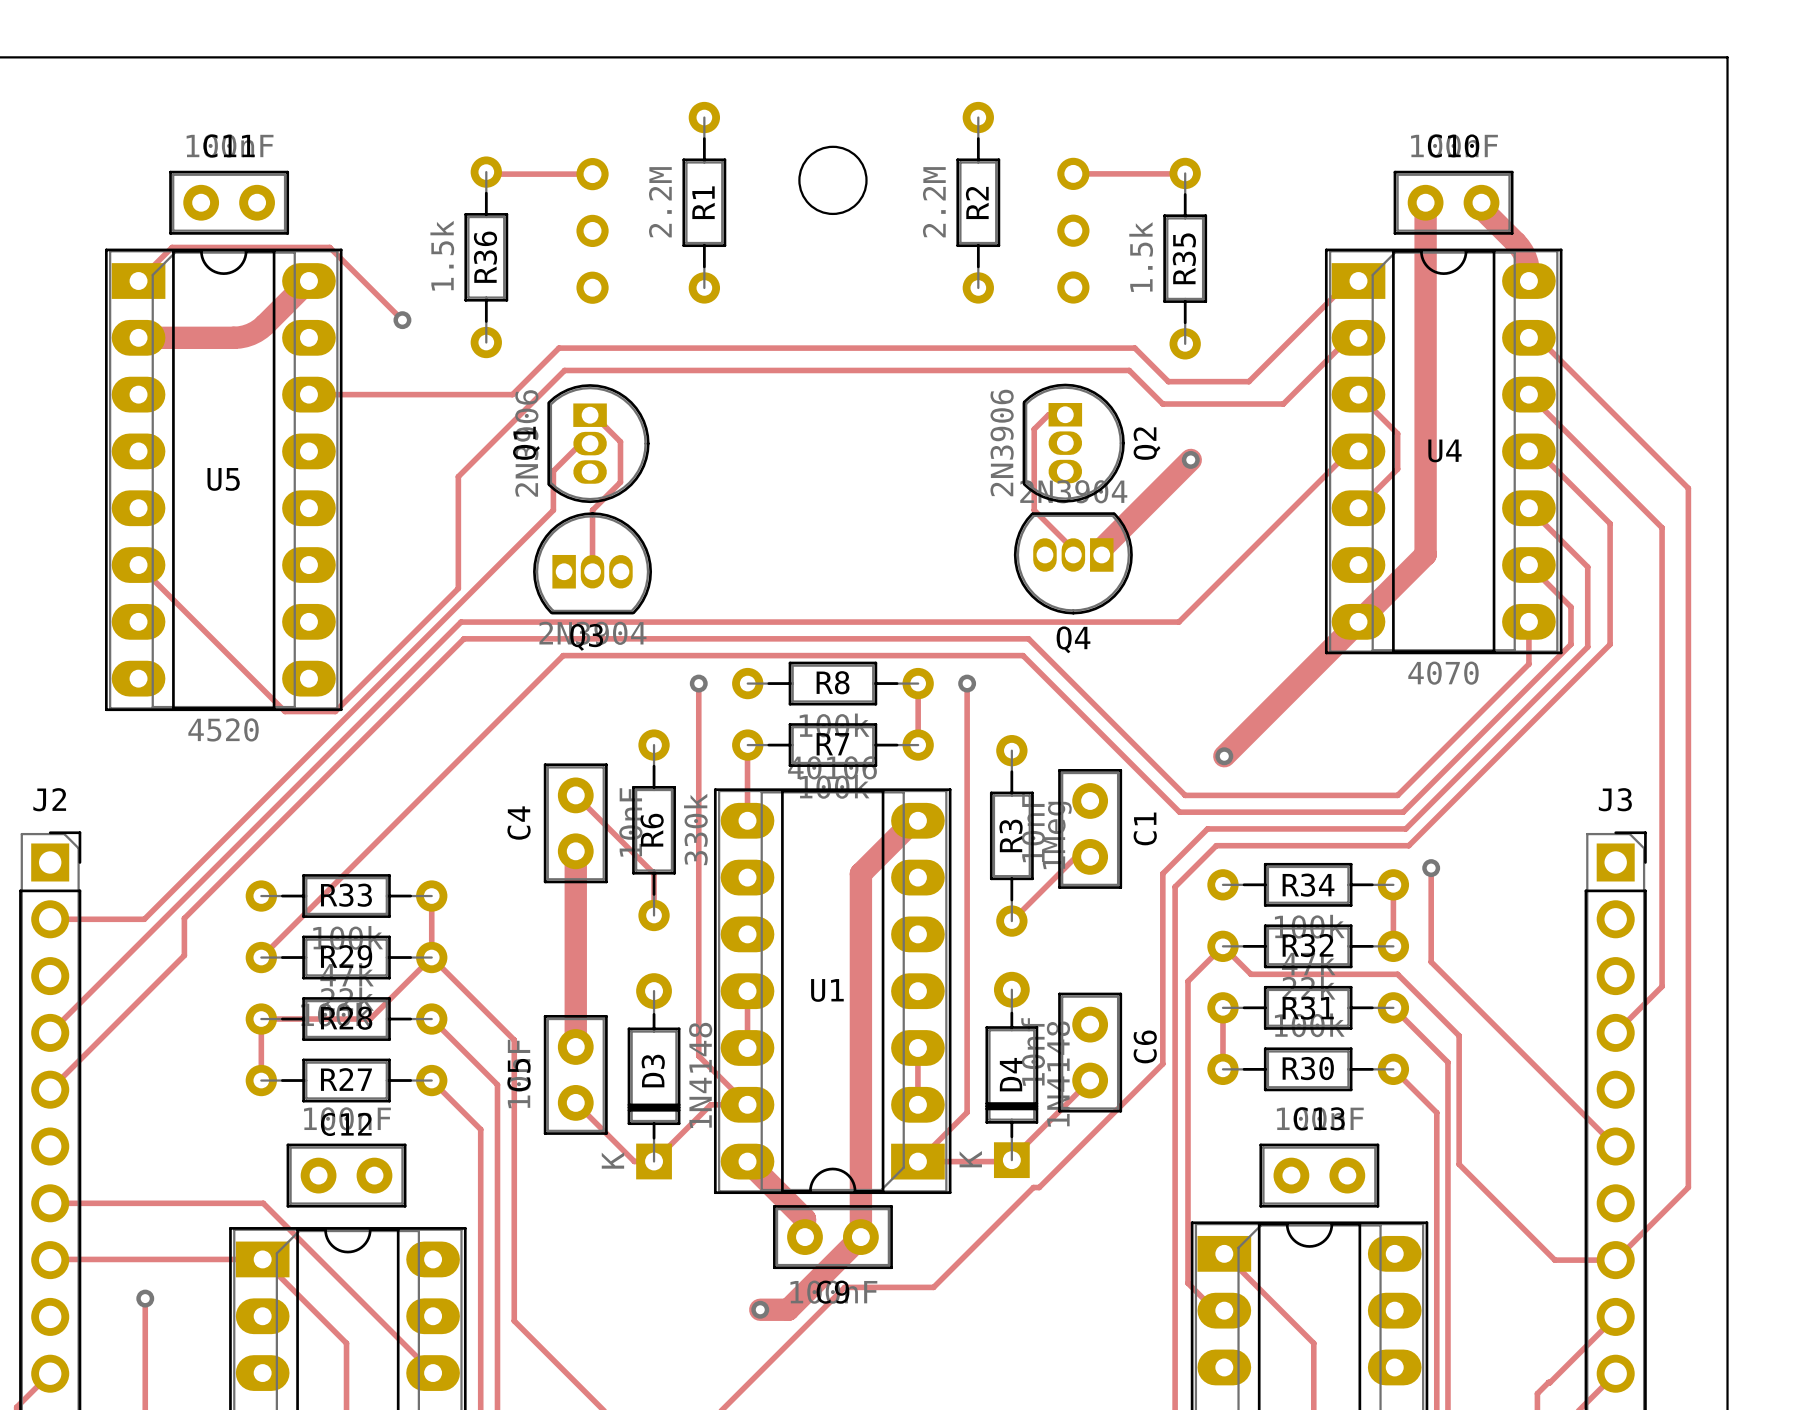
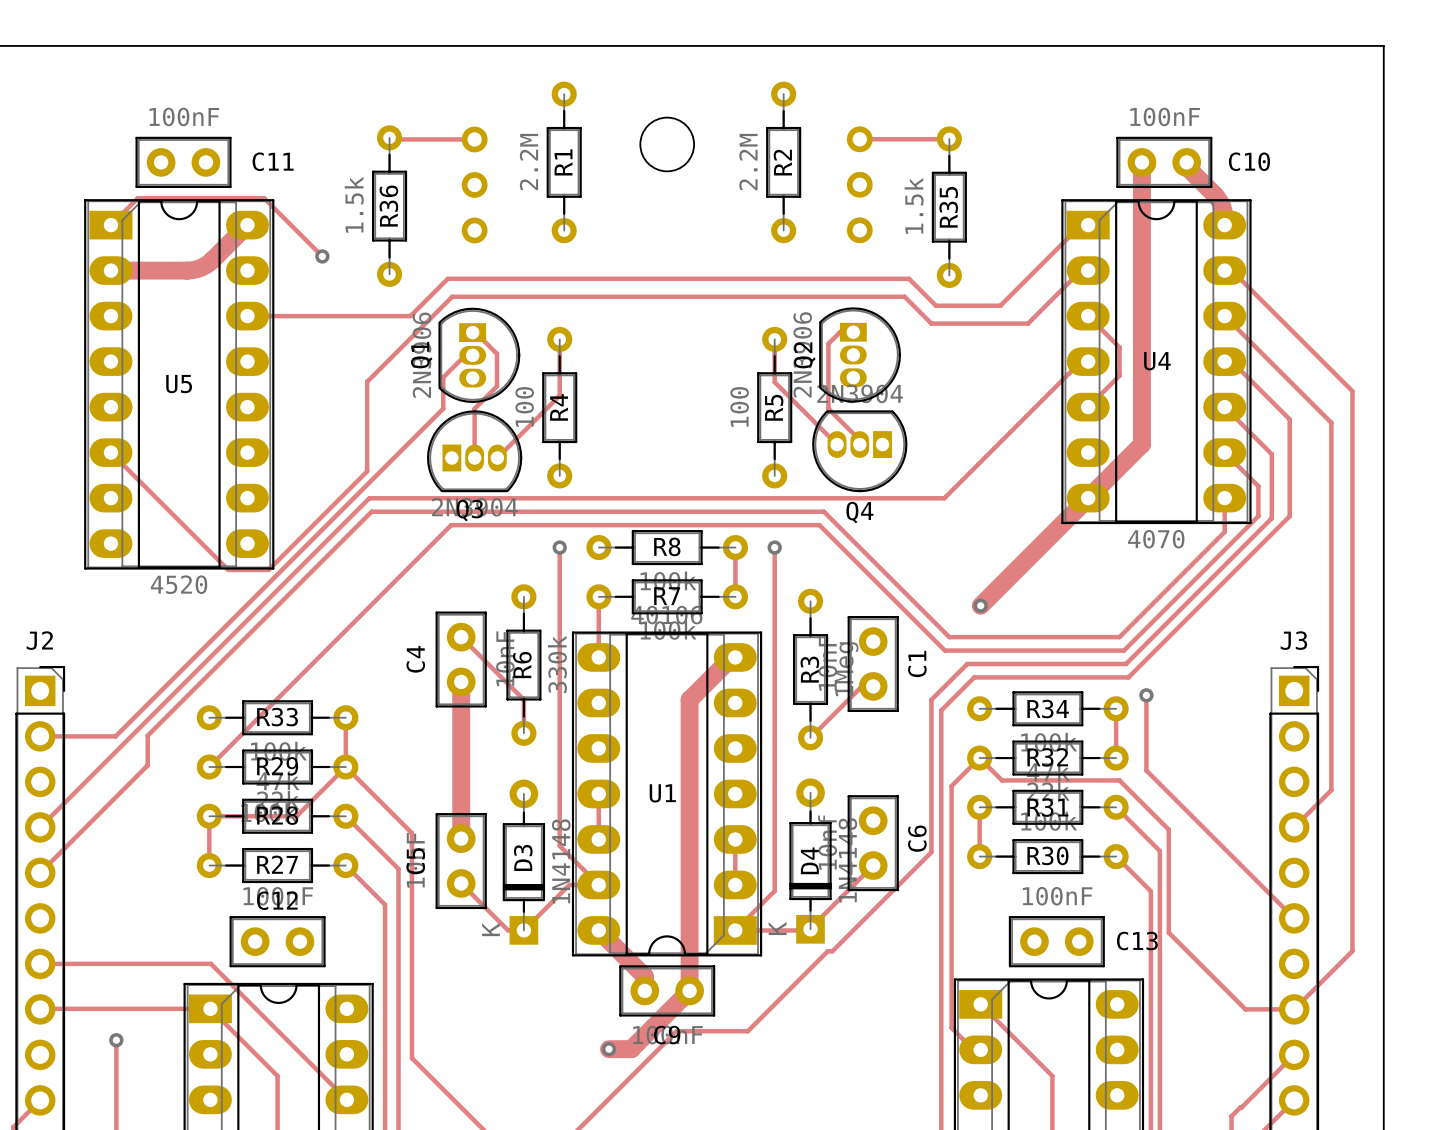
C11 name position: C11 (229, 146) -> C11 (273, 161)
C10 name position: C10 (1453, 146) -> C10 (1249, 161)
track: none -> (559, 339) (559, 395) (497, 457)
track: none -> (774, 341) (774, 382) (837, 444)
Q2 name position: Q2 (1147, 443) -> Q2 (804, 355)
track: (1190, 459) (1101, 548) (1101, 554) -> none
via: (1190, 459) -> none
R4: none -> 100 (559, 407)
R5: none -> 100 (774, 407)
C13 name position: C13 (1319, 1118) -> C13 (1137, 941)

